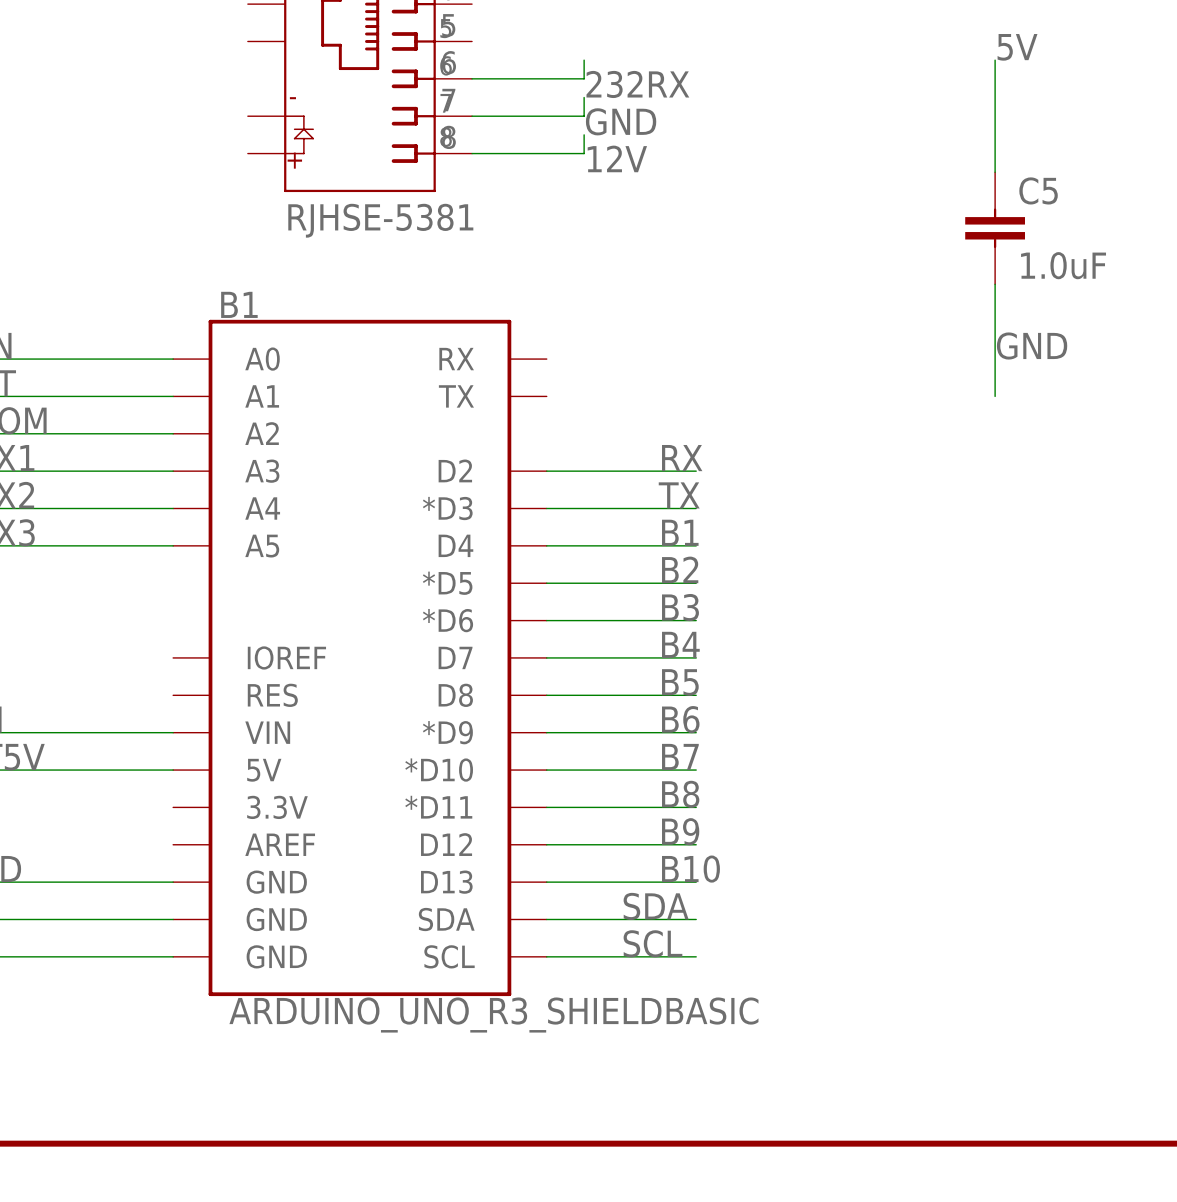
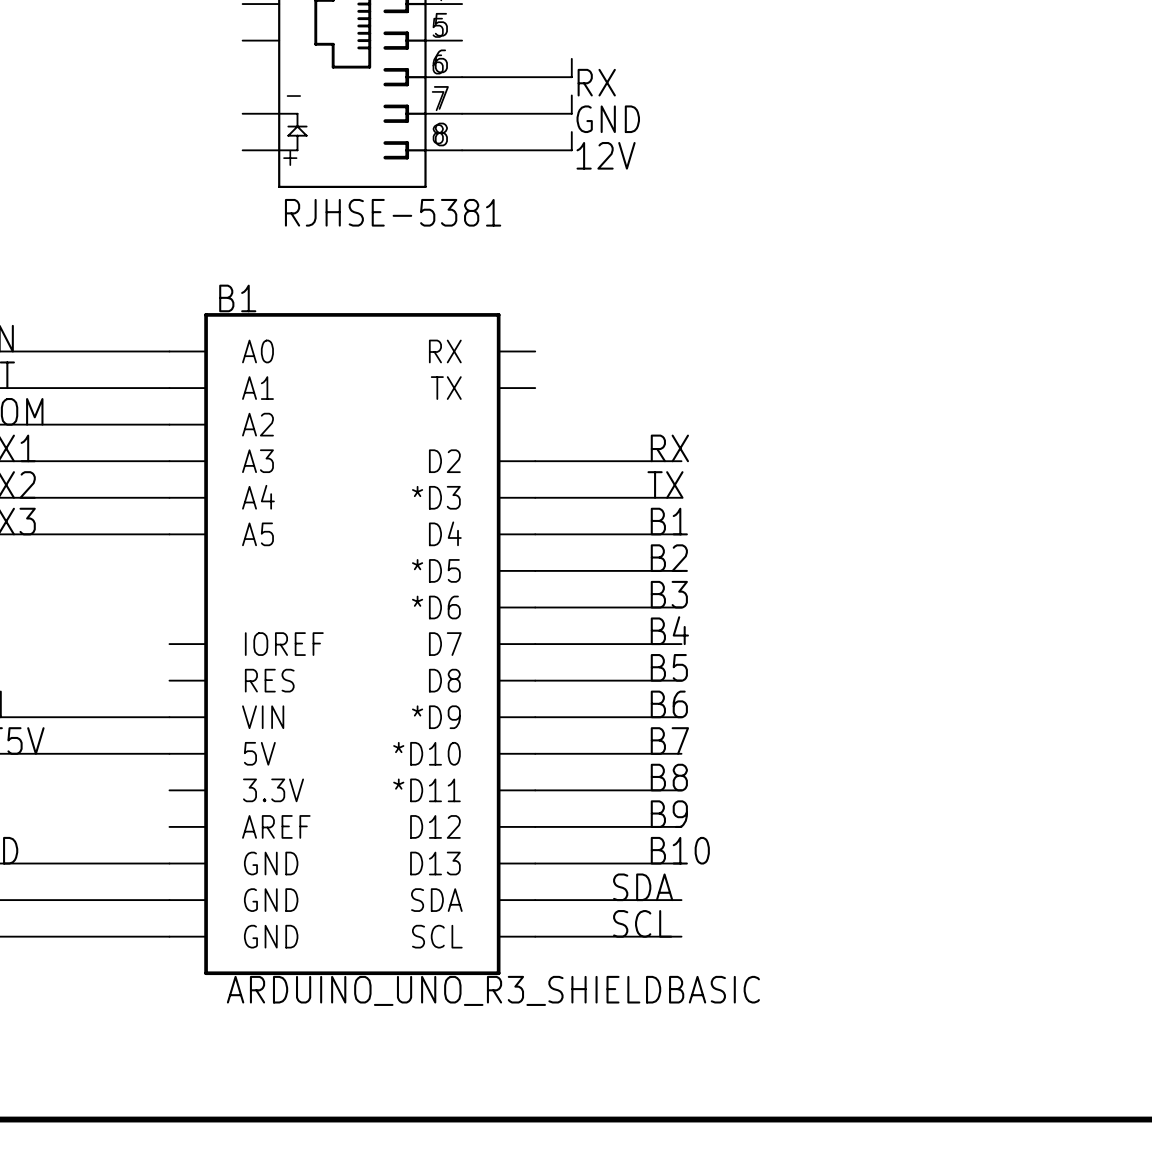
label: 5V (1017, 47) -> none
wire: (995, 60) (995, 172) -> none
label: 232RX (637, 84) -> RX (596, 82)
C5: 1.0uF (995, 228) -> none
wire: (995, 284) (995, 396) -> none
label: GND (1032, 346) -> none

